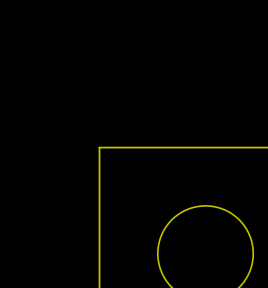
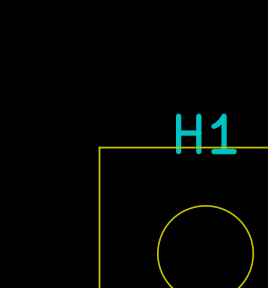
H1 name: none -> H1 (206, 133)

